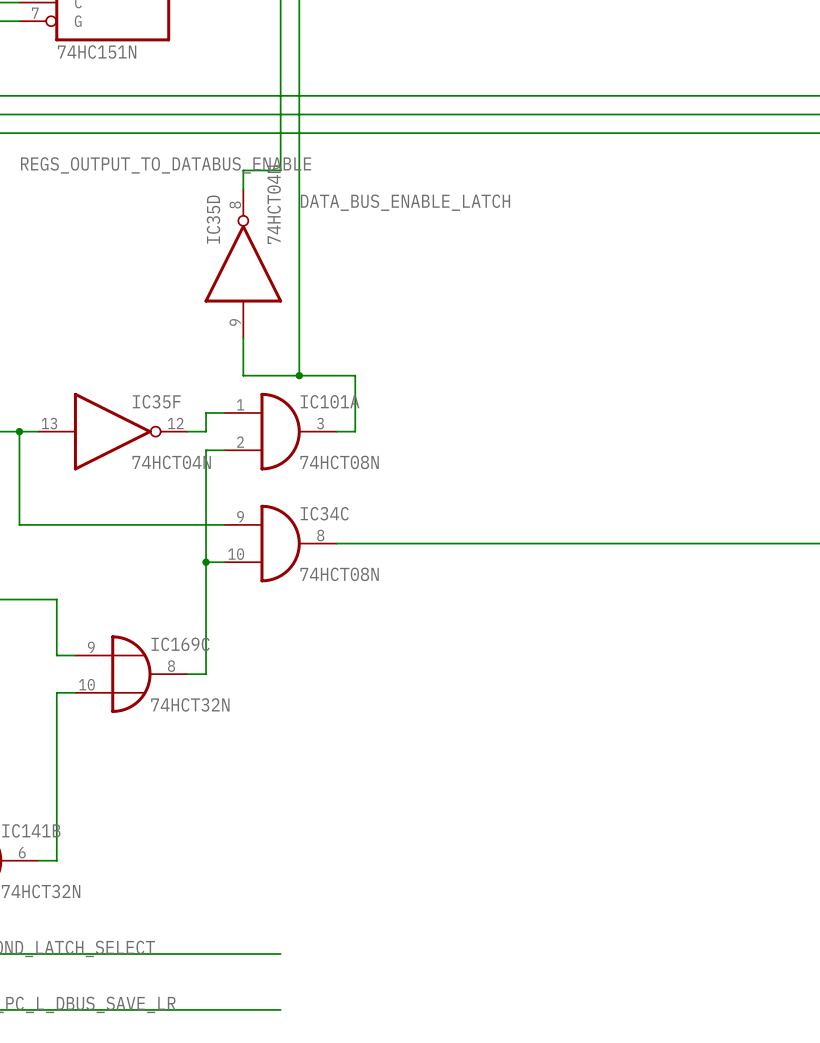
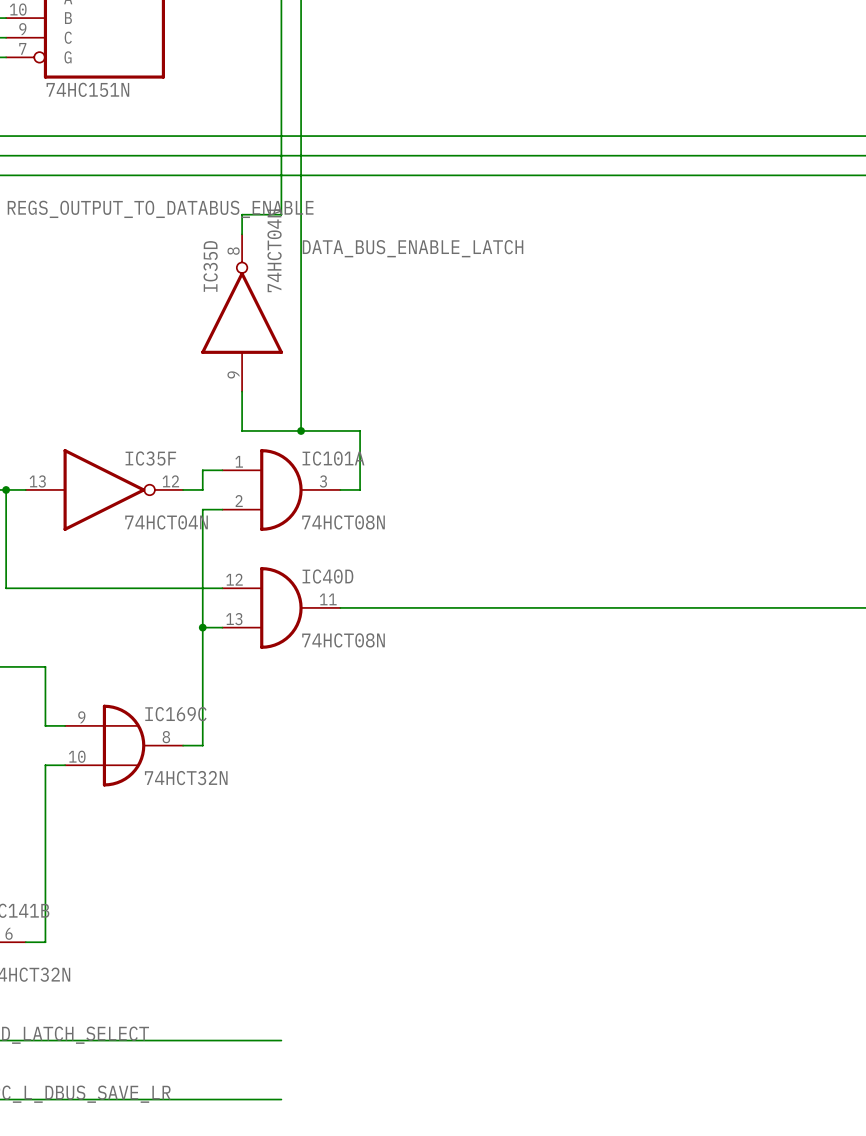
IC34C name: IC34C (324, 513) -> IC40D (327, 576)
IC34C pin number: 9 (240, 516) -> 12 (234, 579)
IC34C pin number: 8 (320, 535) -> 11 (328, 599)
IC34C pin number: 10 (236, 554) -> 13 (234, 619)

